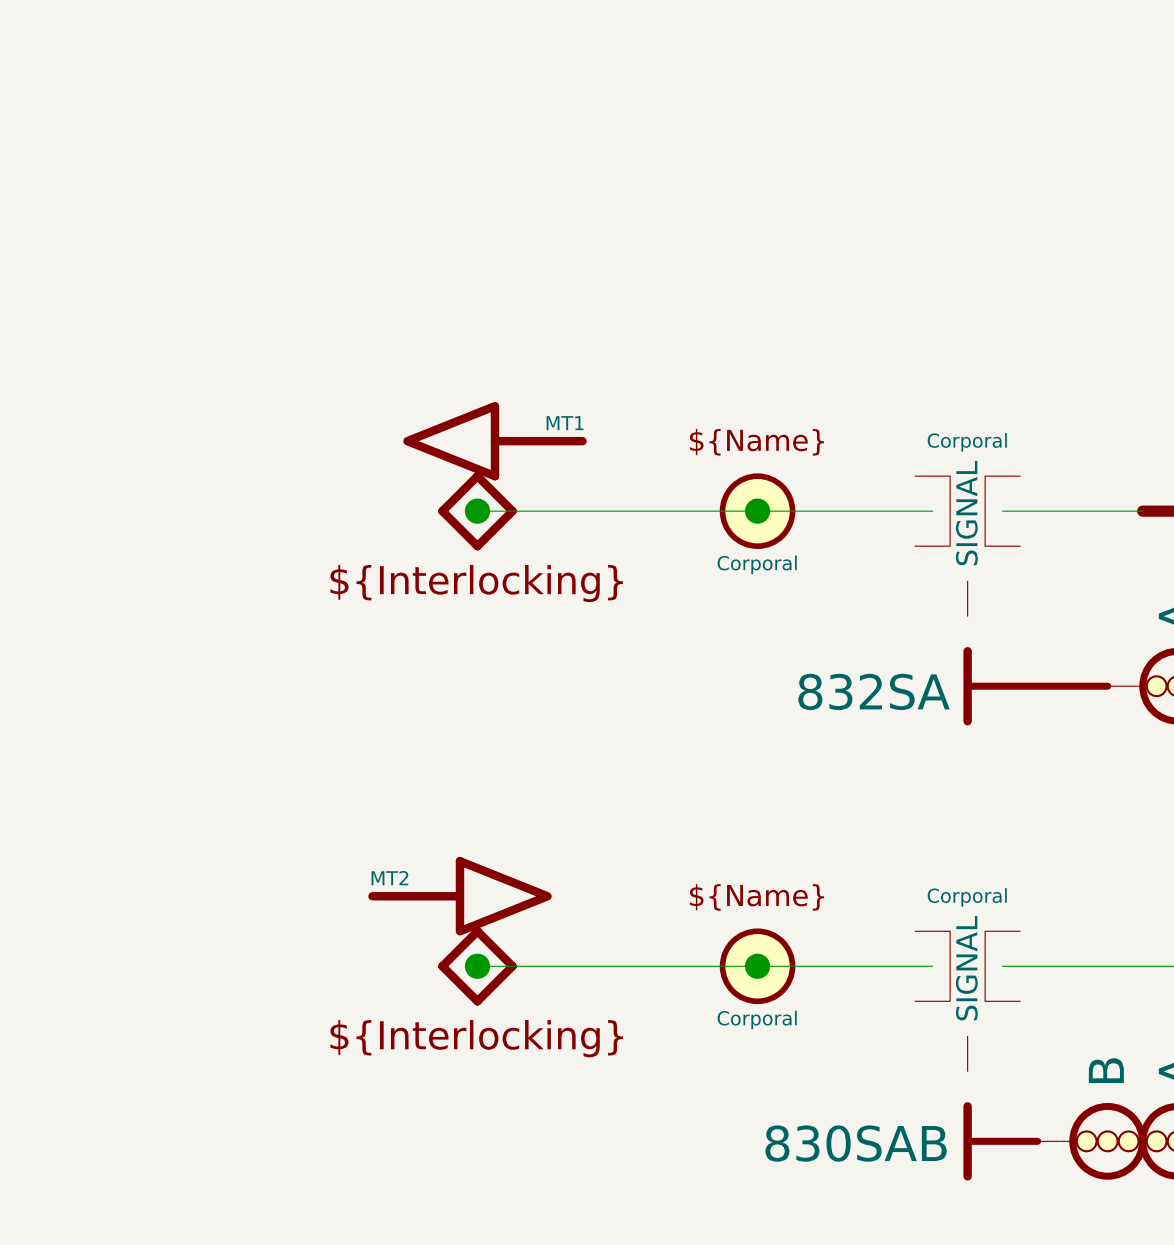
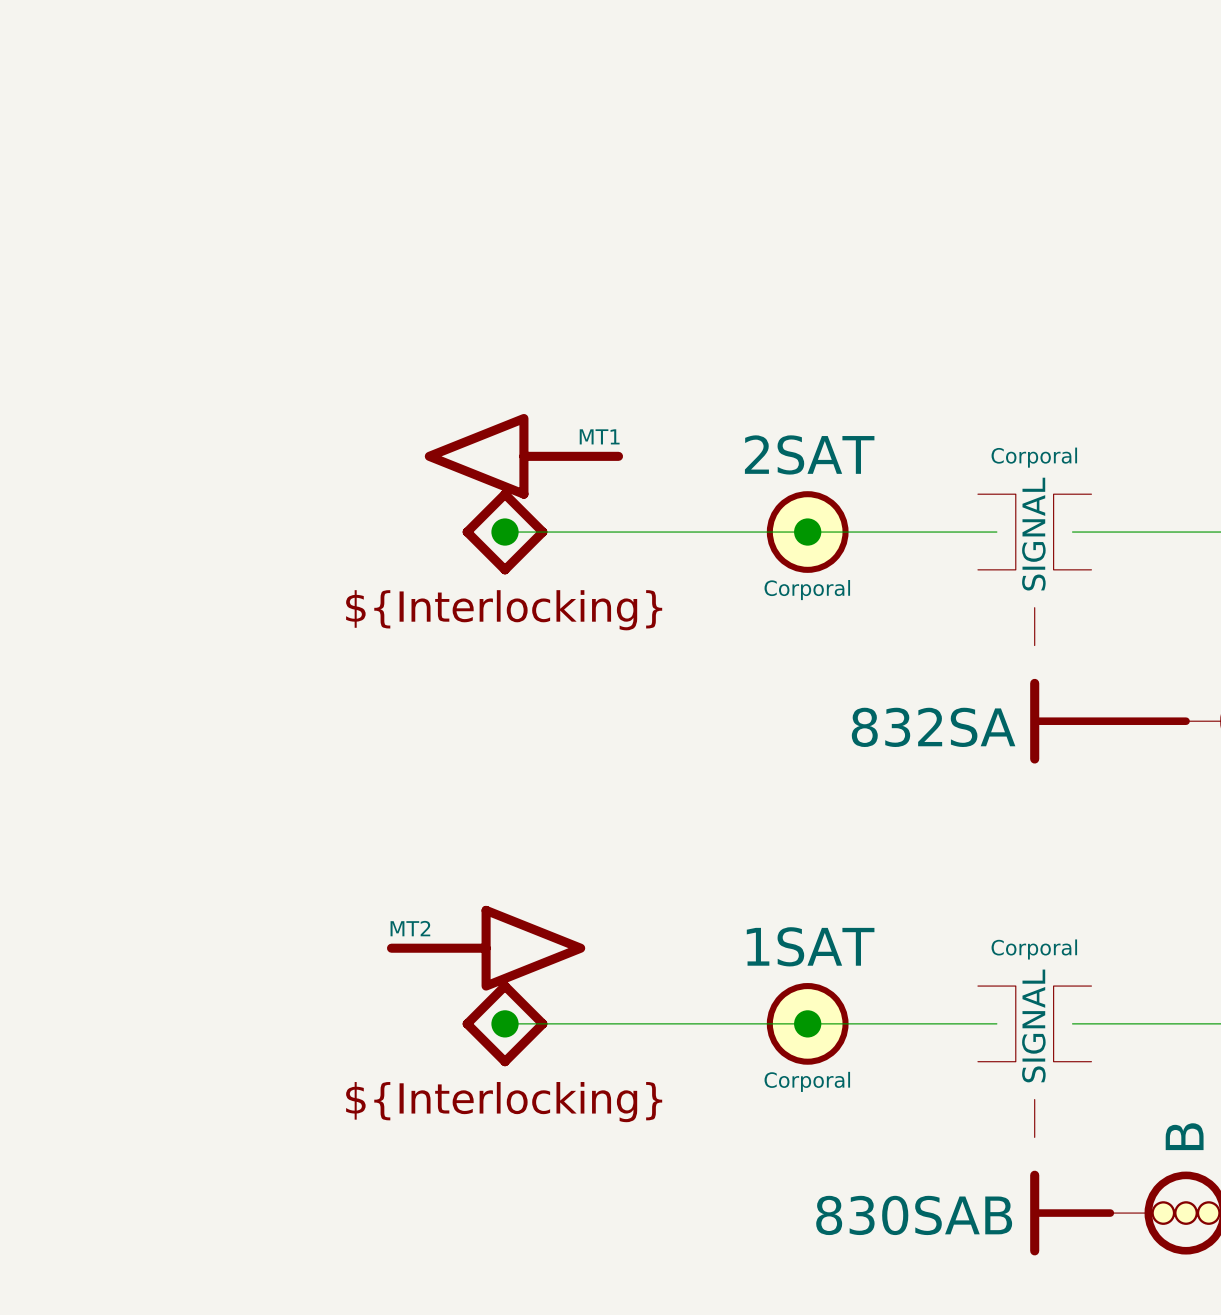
part value: none -> 2SAT (809, 454)
part text: ${Name} (756, 442) -> none
part value: none -> 1SAT (810, 946)
part text: ${Name} (756, 897) -> none

